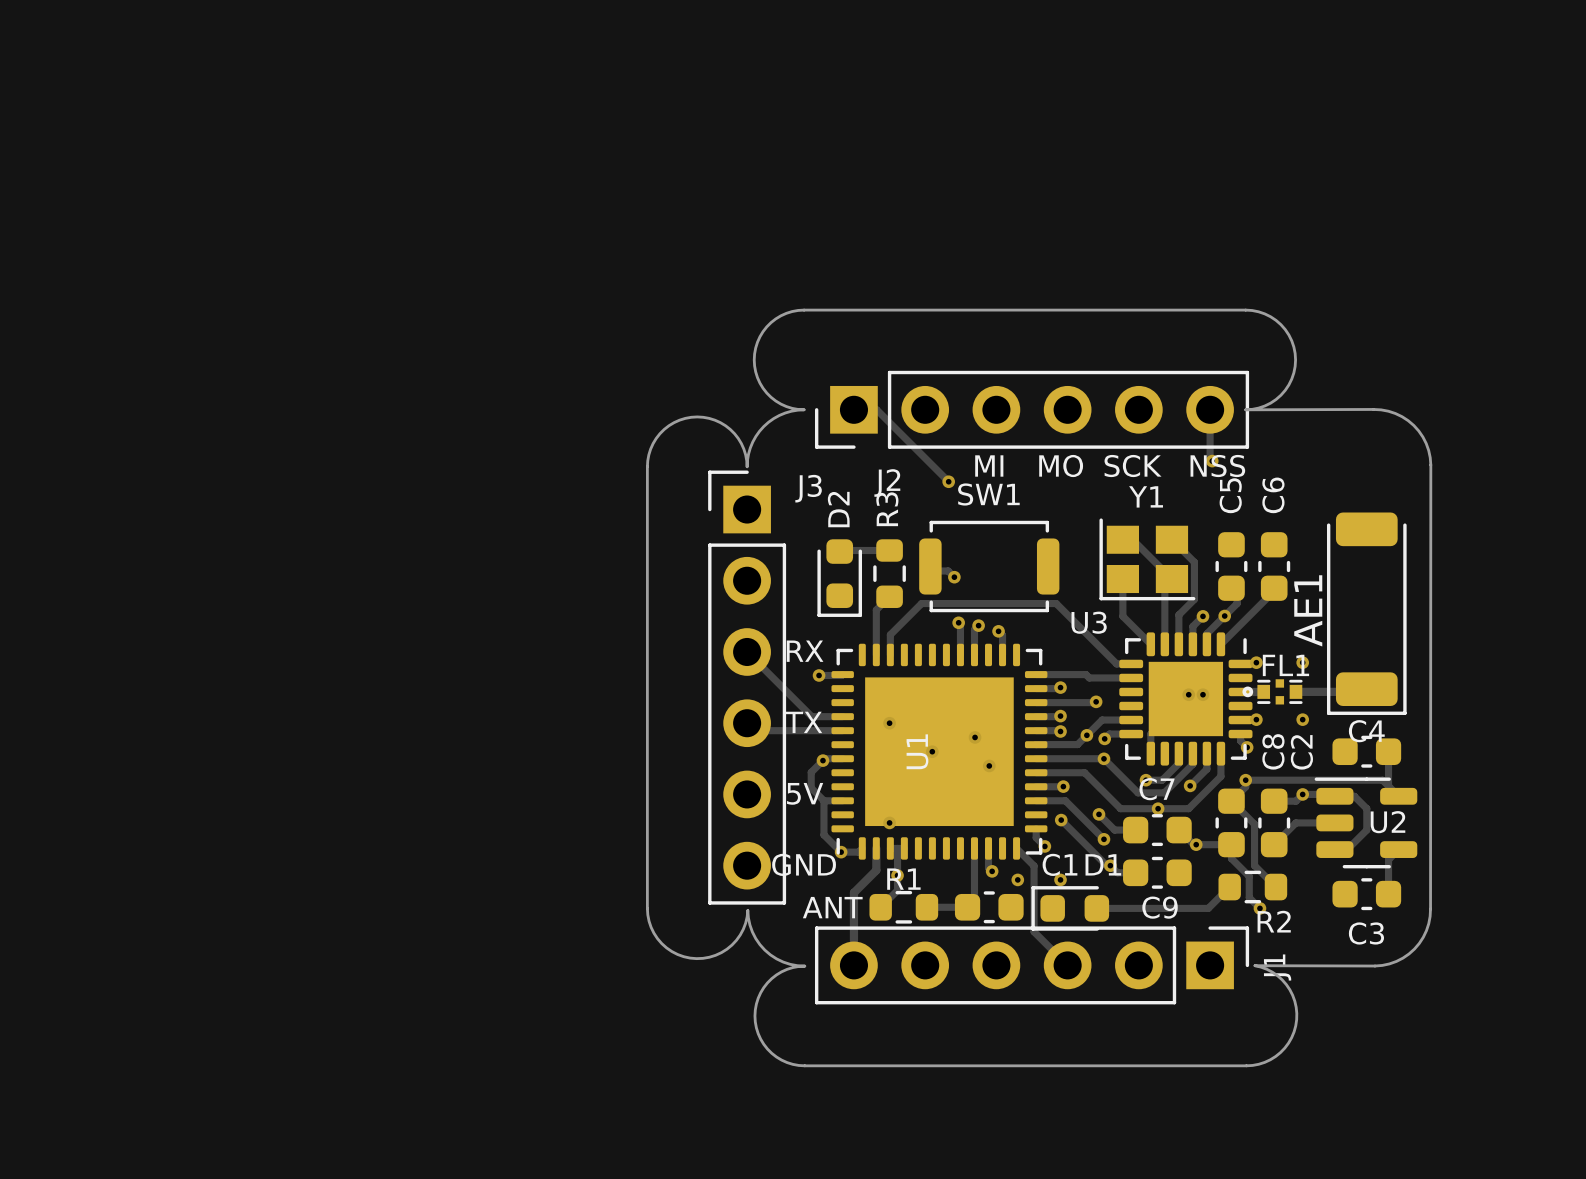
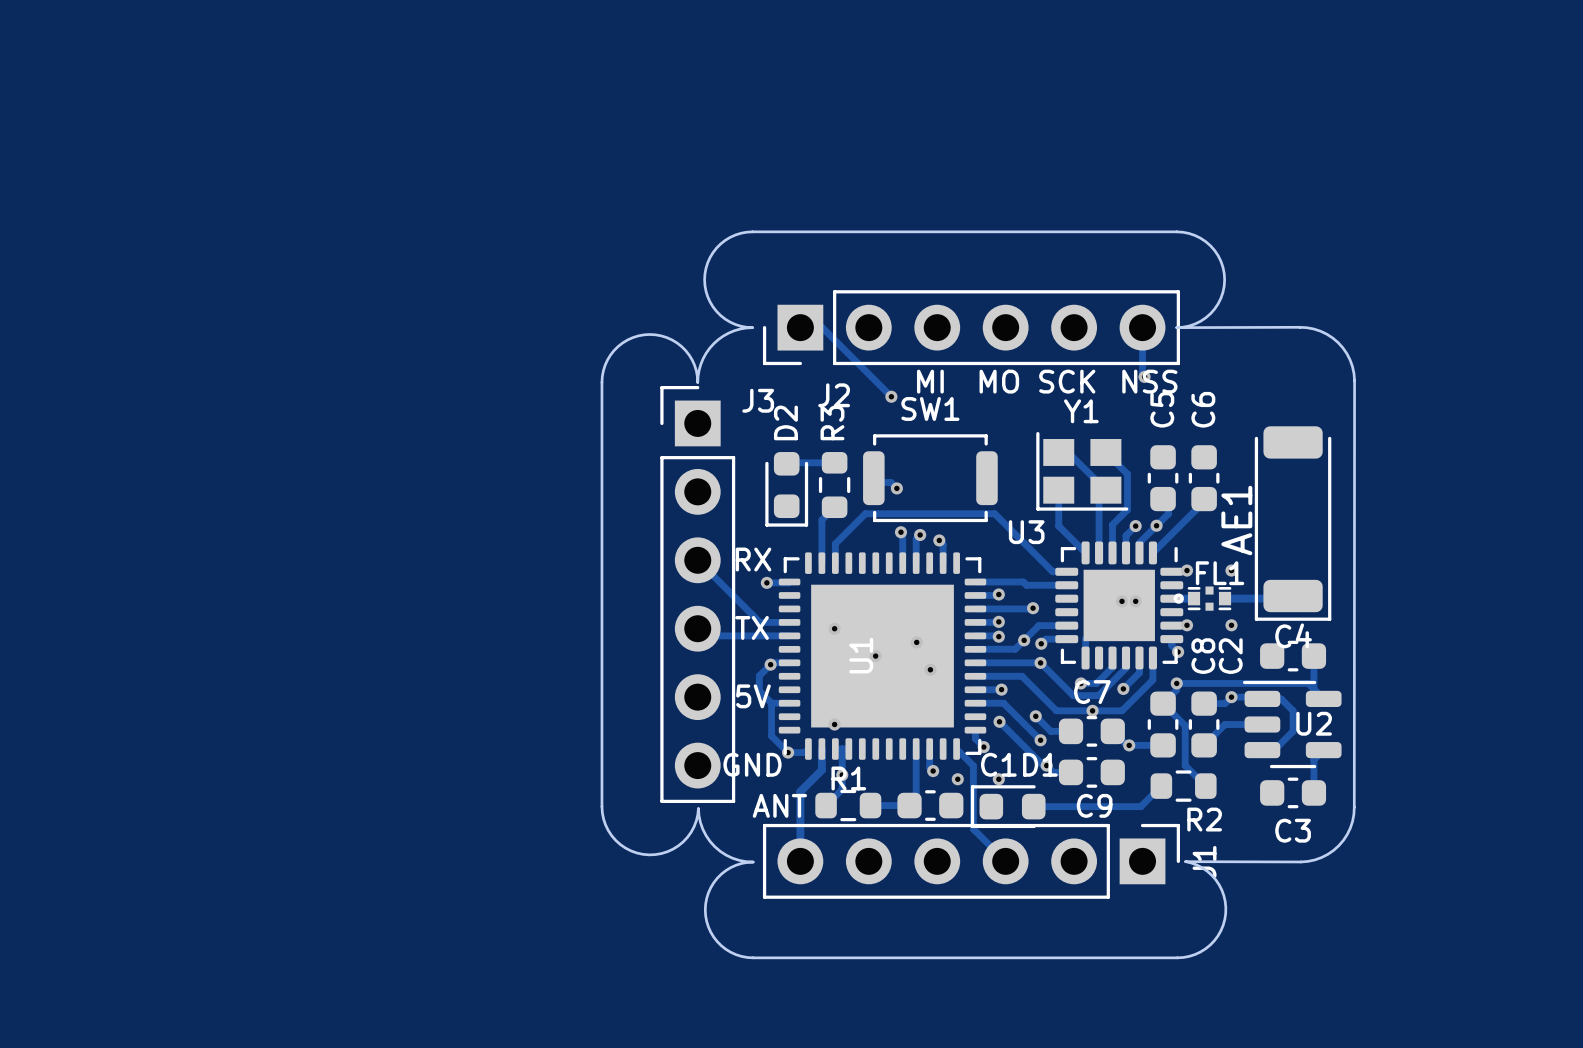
track: (1231, 844) (1231, 858) (1249, 876) (1249, 897) (1259, 908) -> none
via: (1259, 908) -> none

